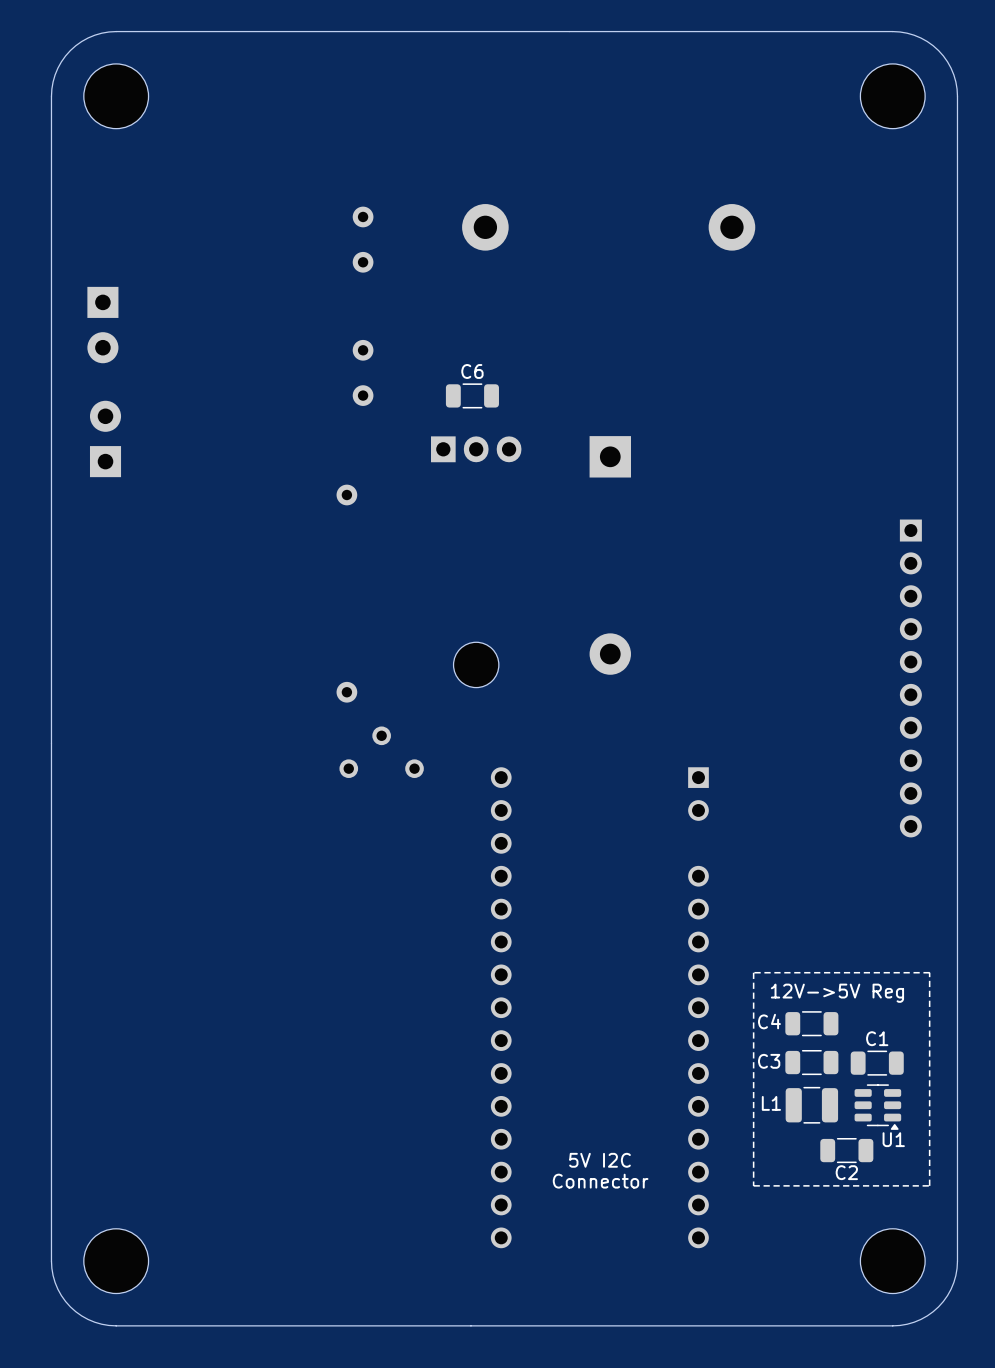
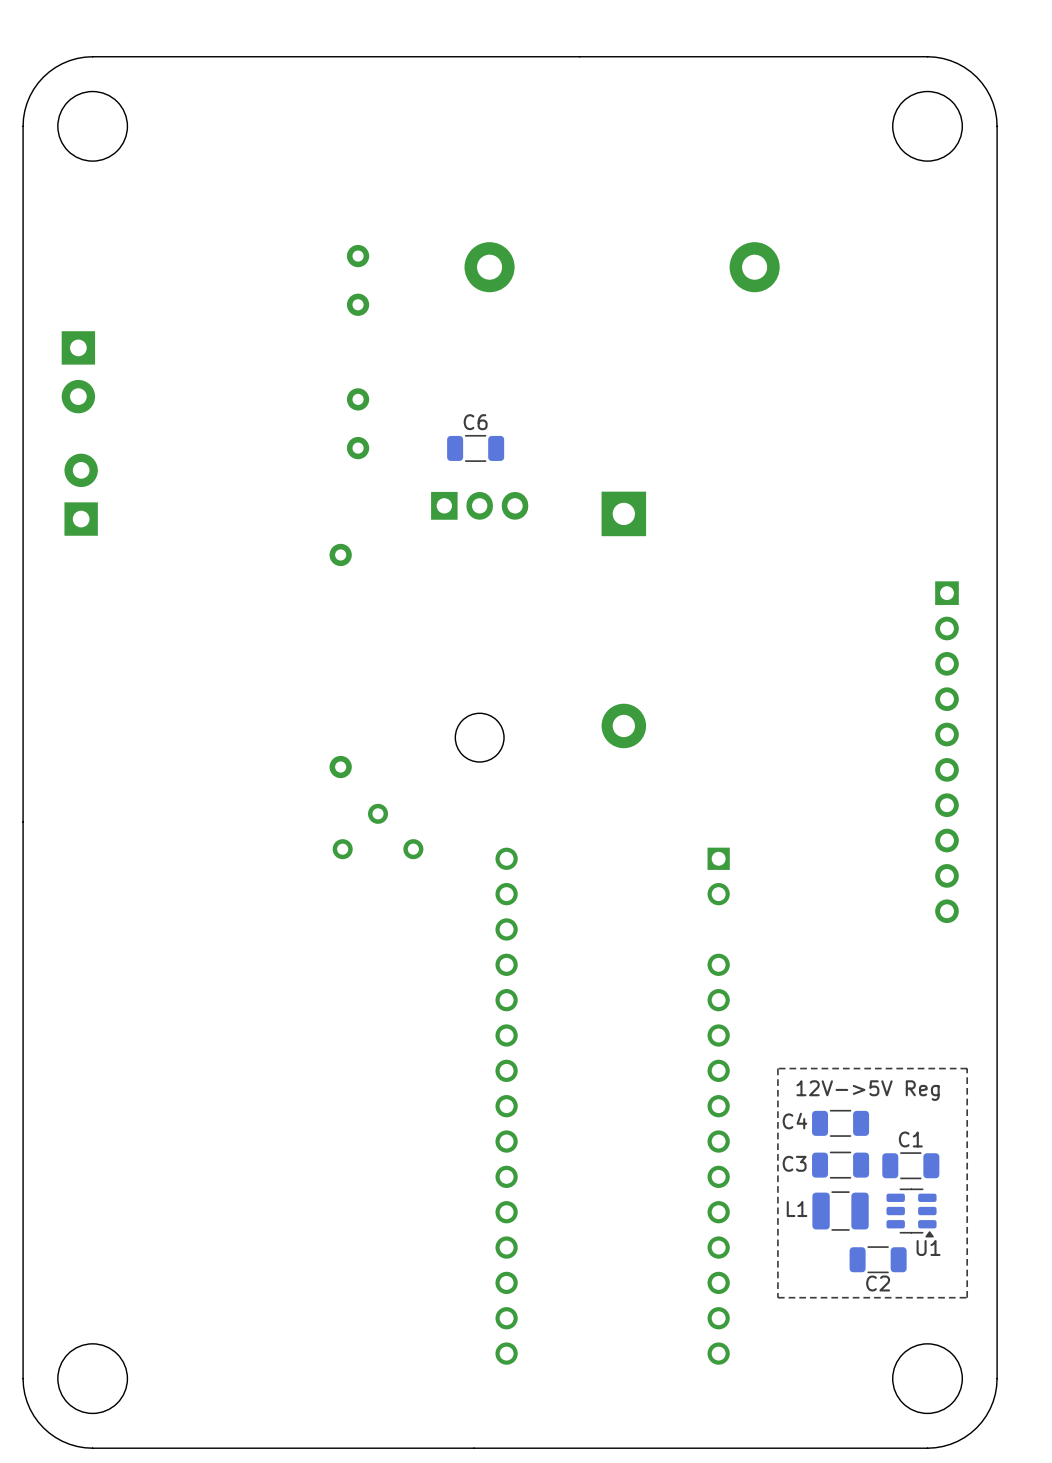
text: 5V I2C (599, 1160) -> none
text: Connector (600, 1181) -> none

